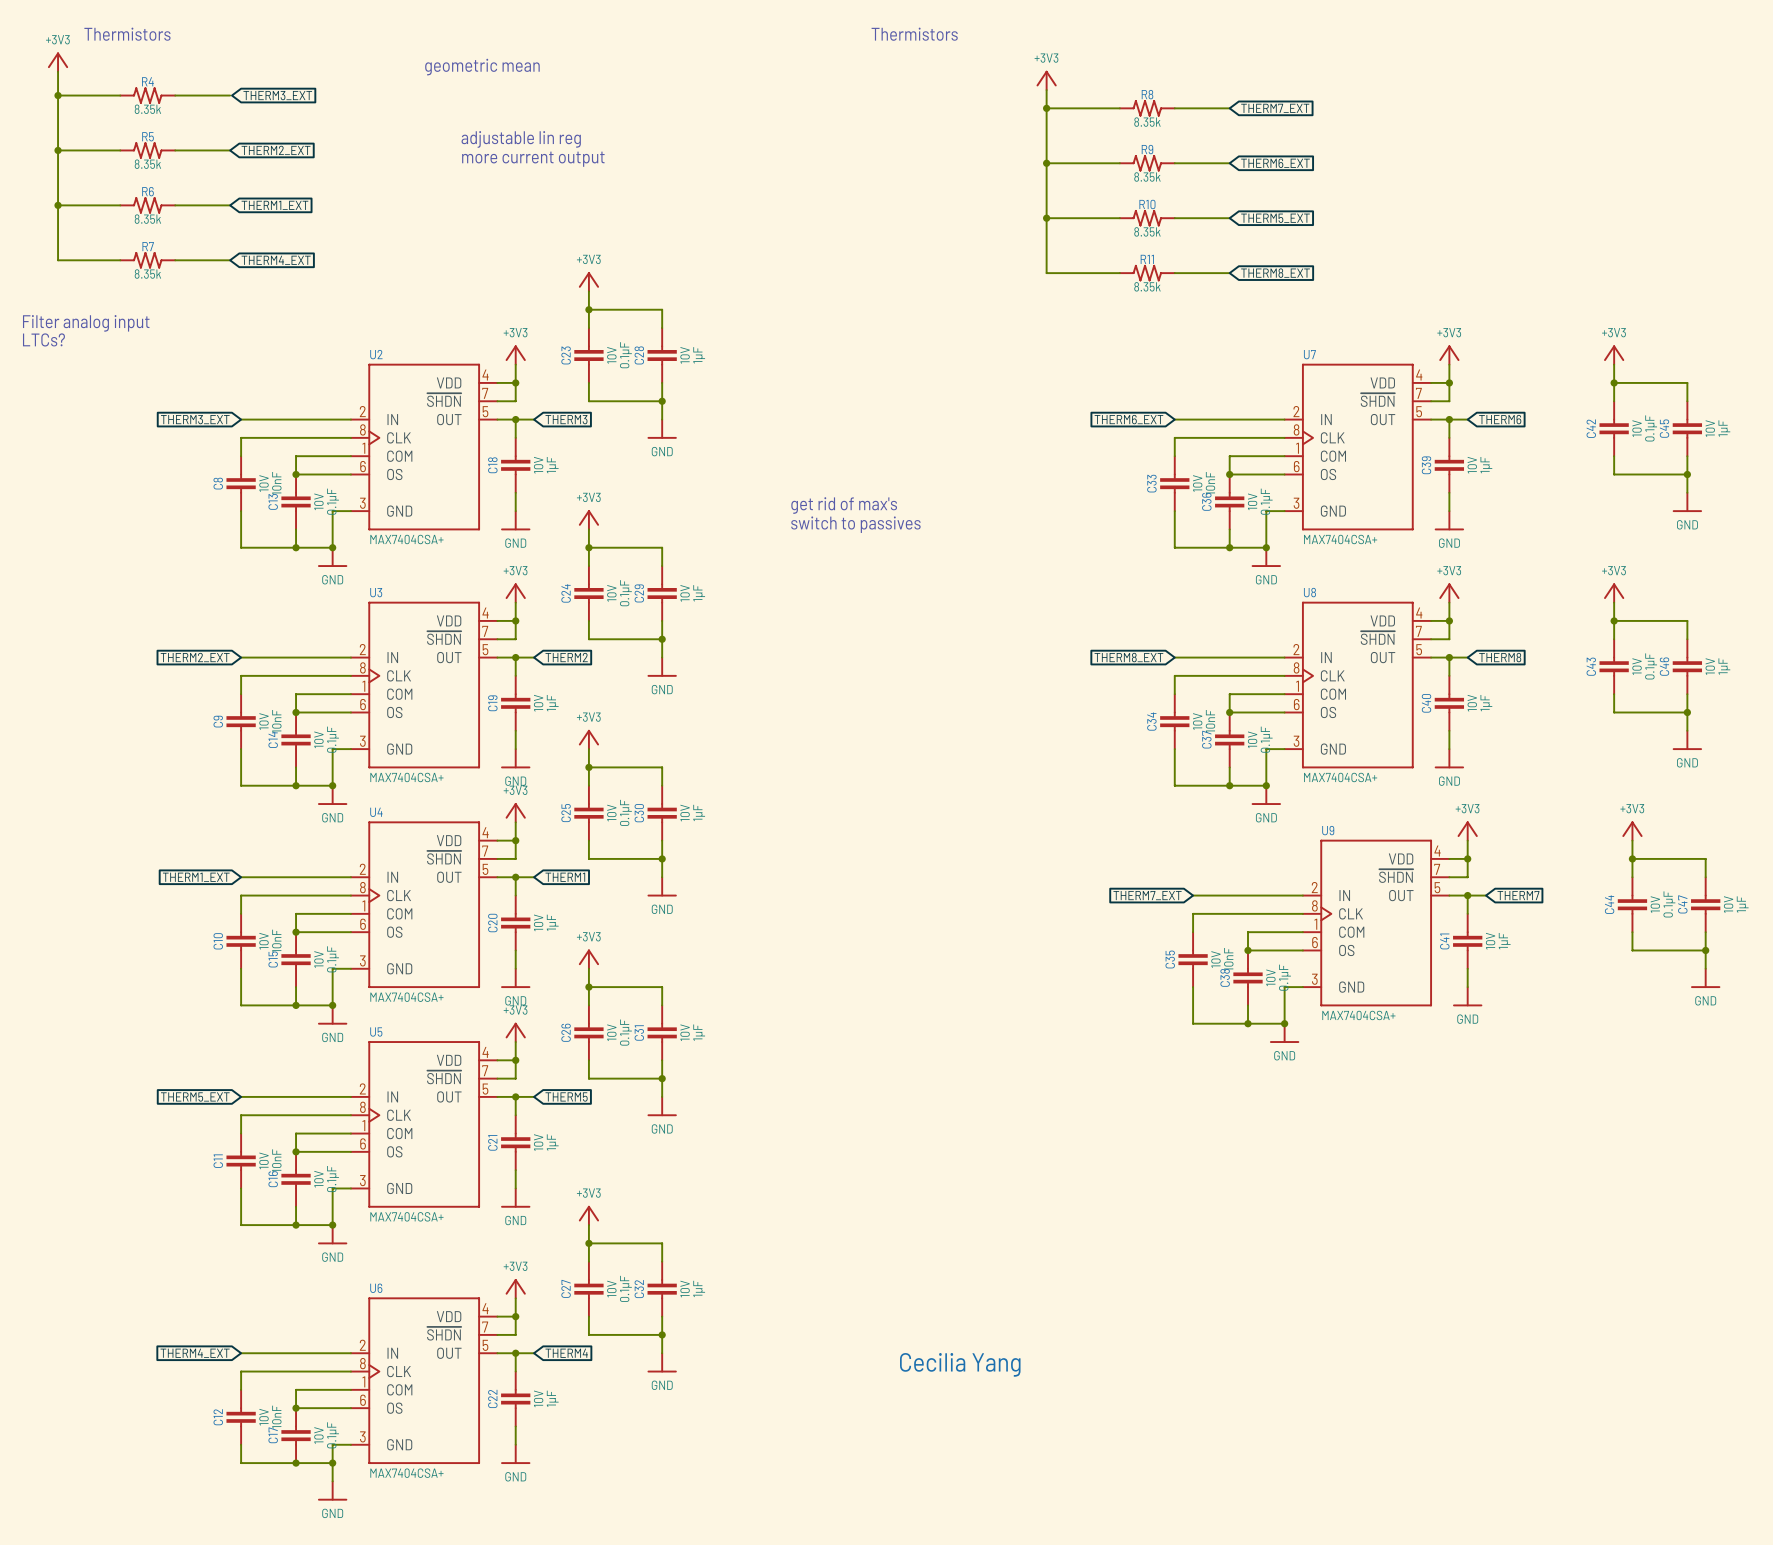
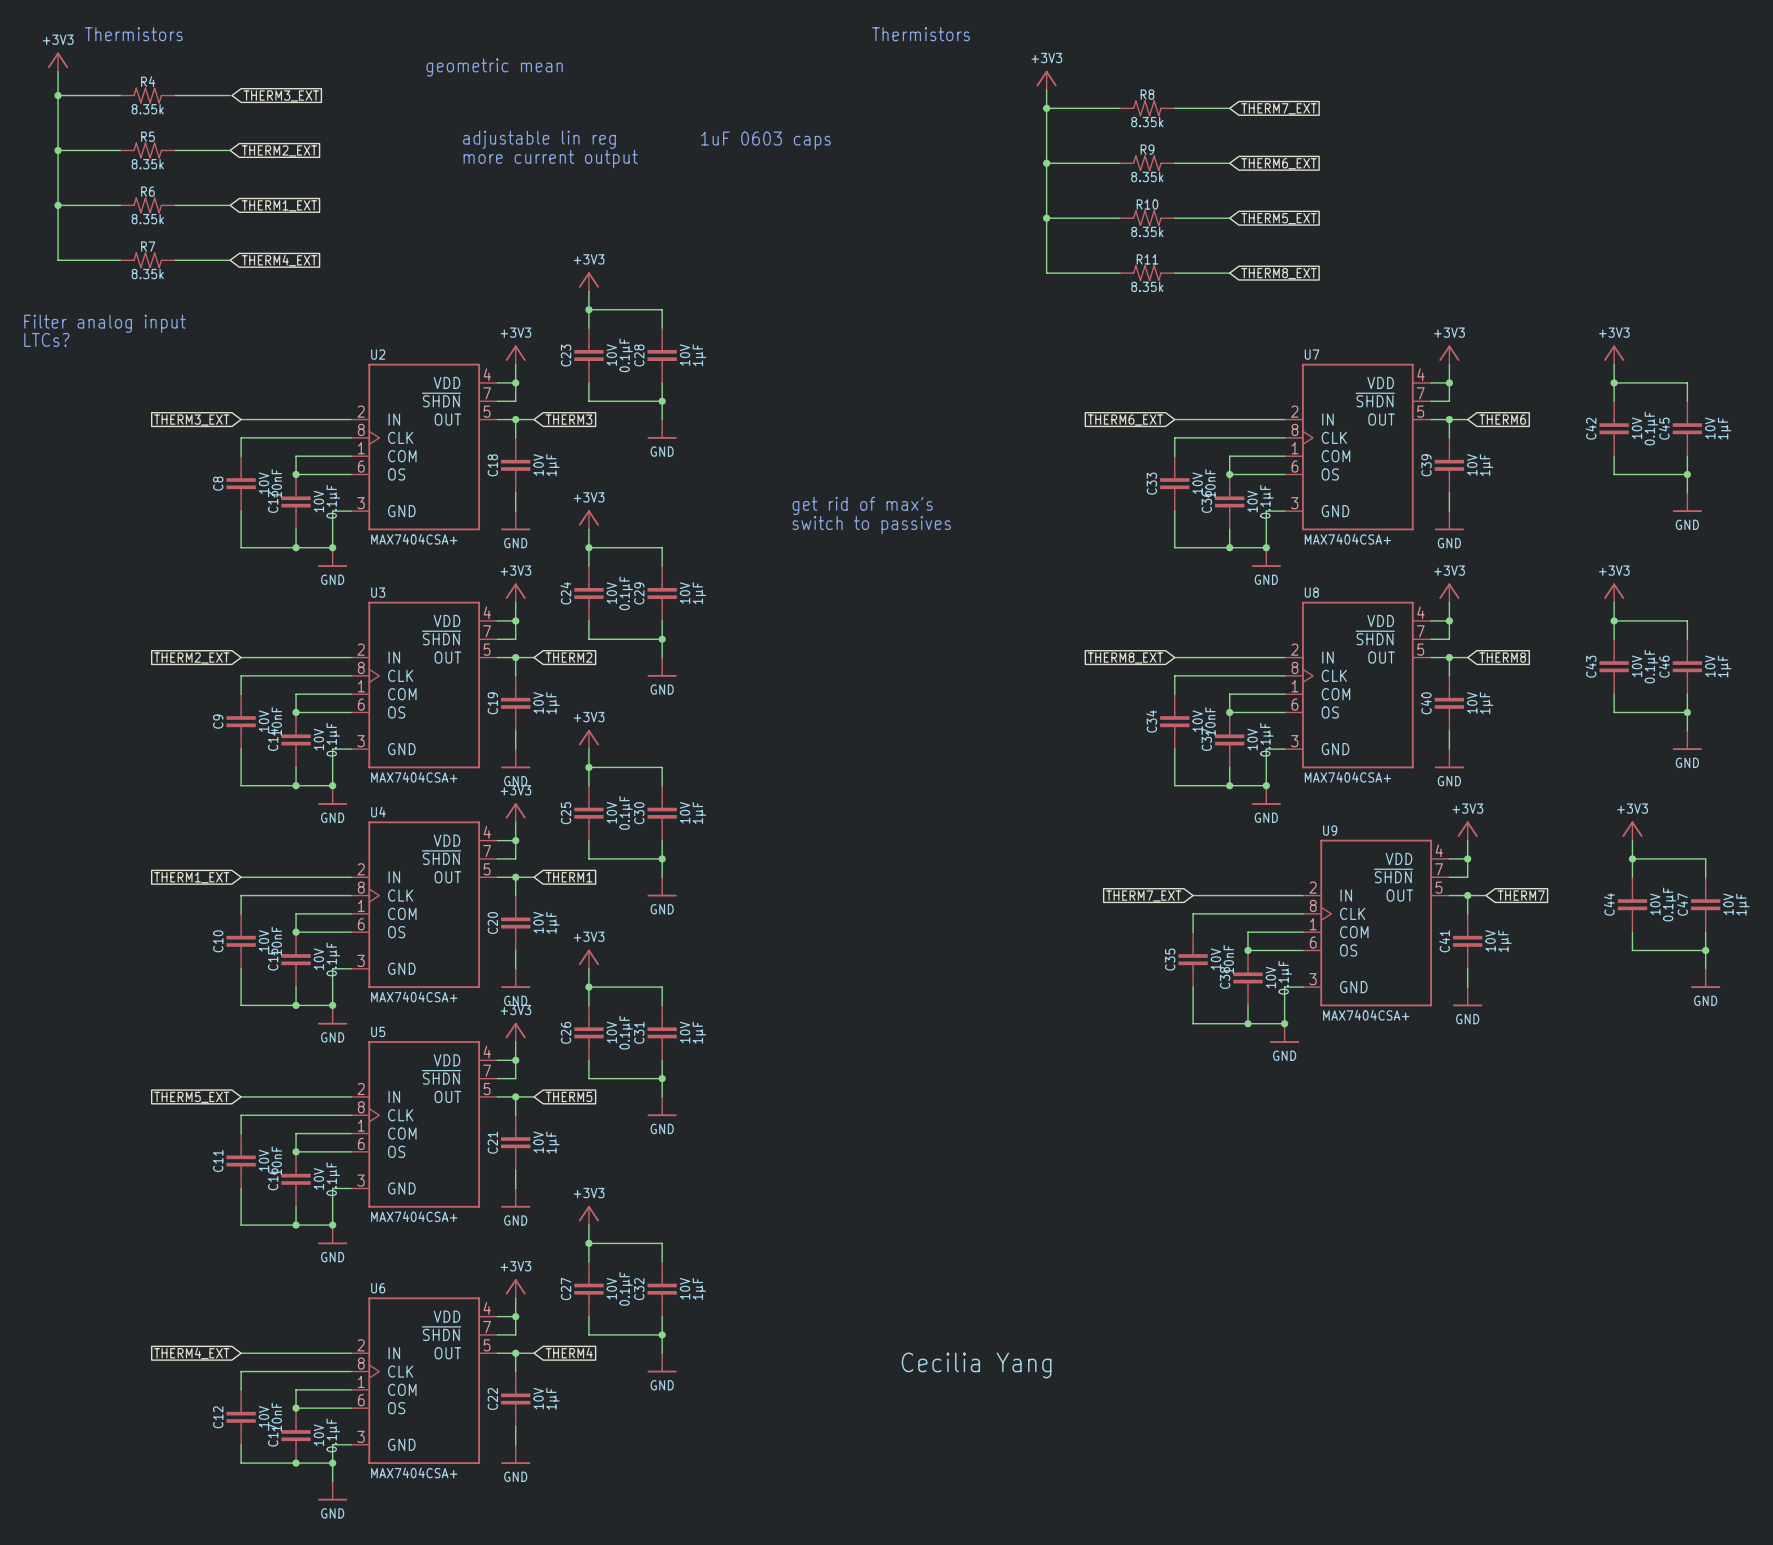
text: none -> 1uF 0603 caps (765, 140)

